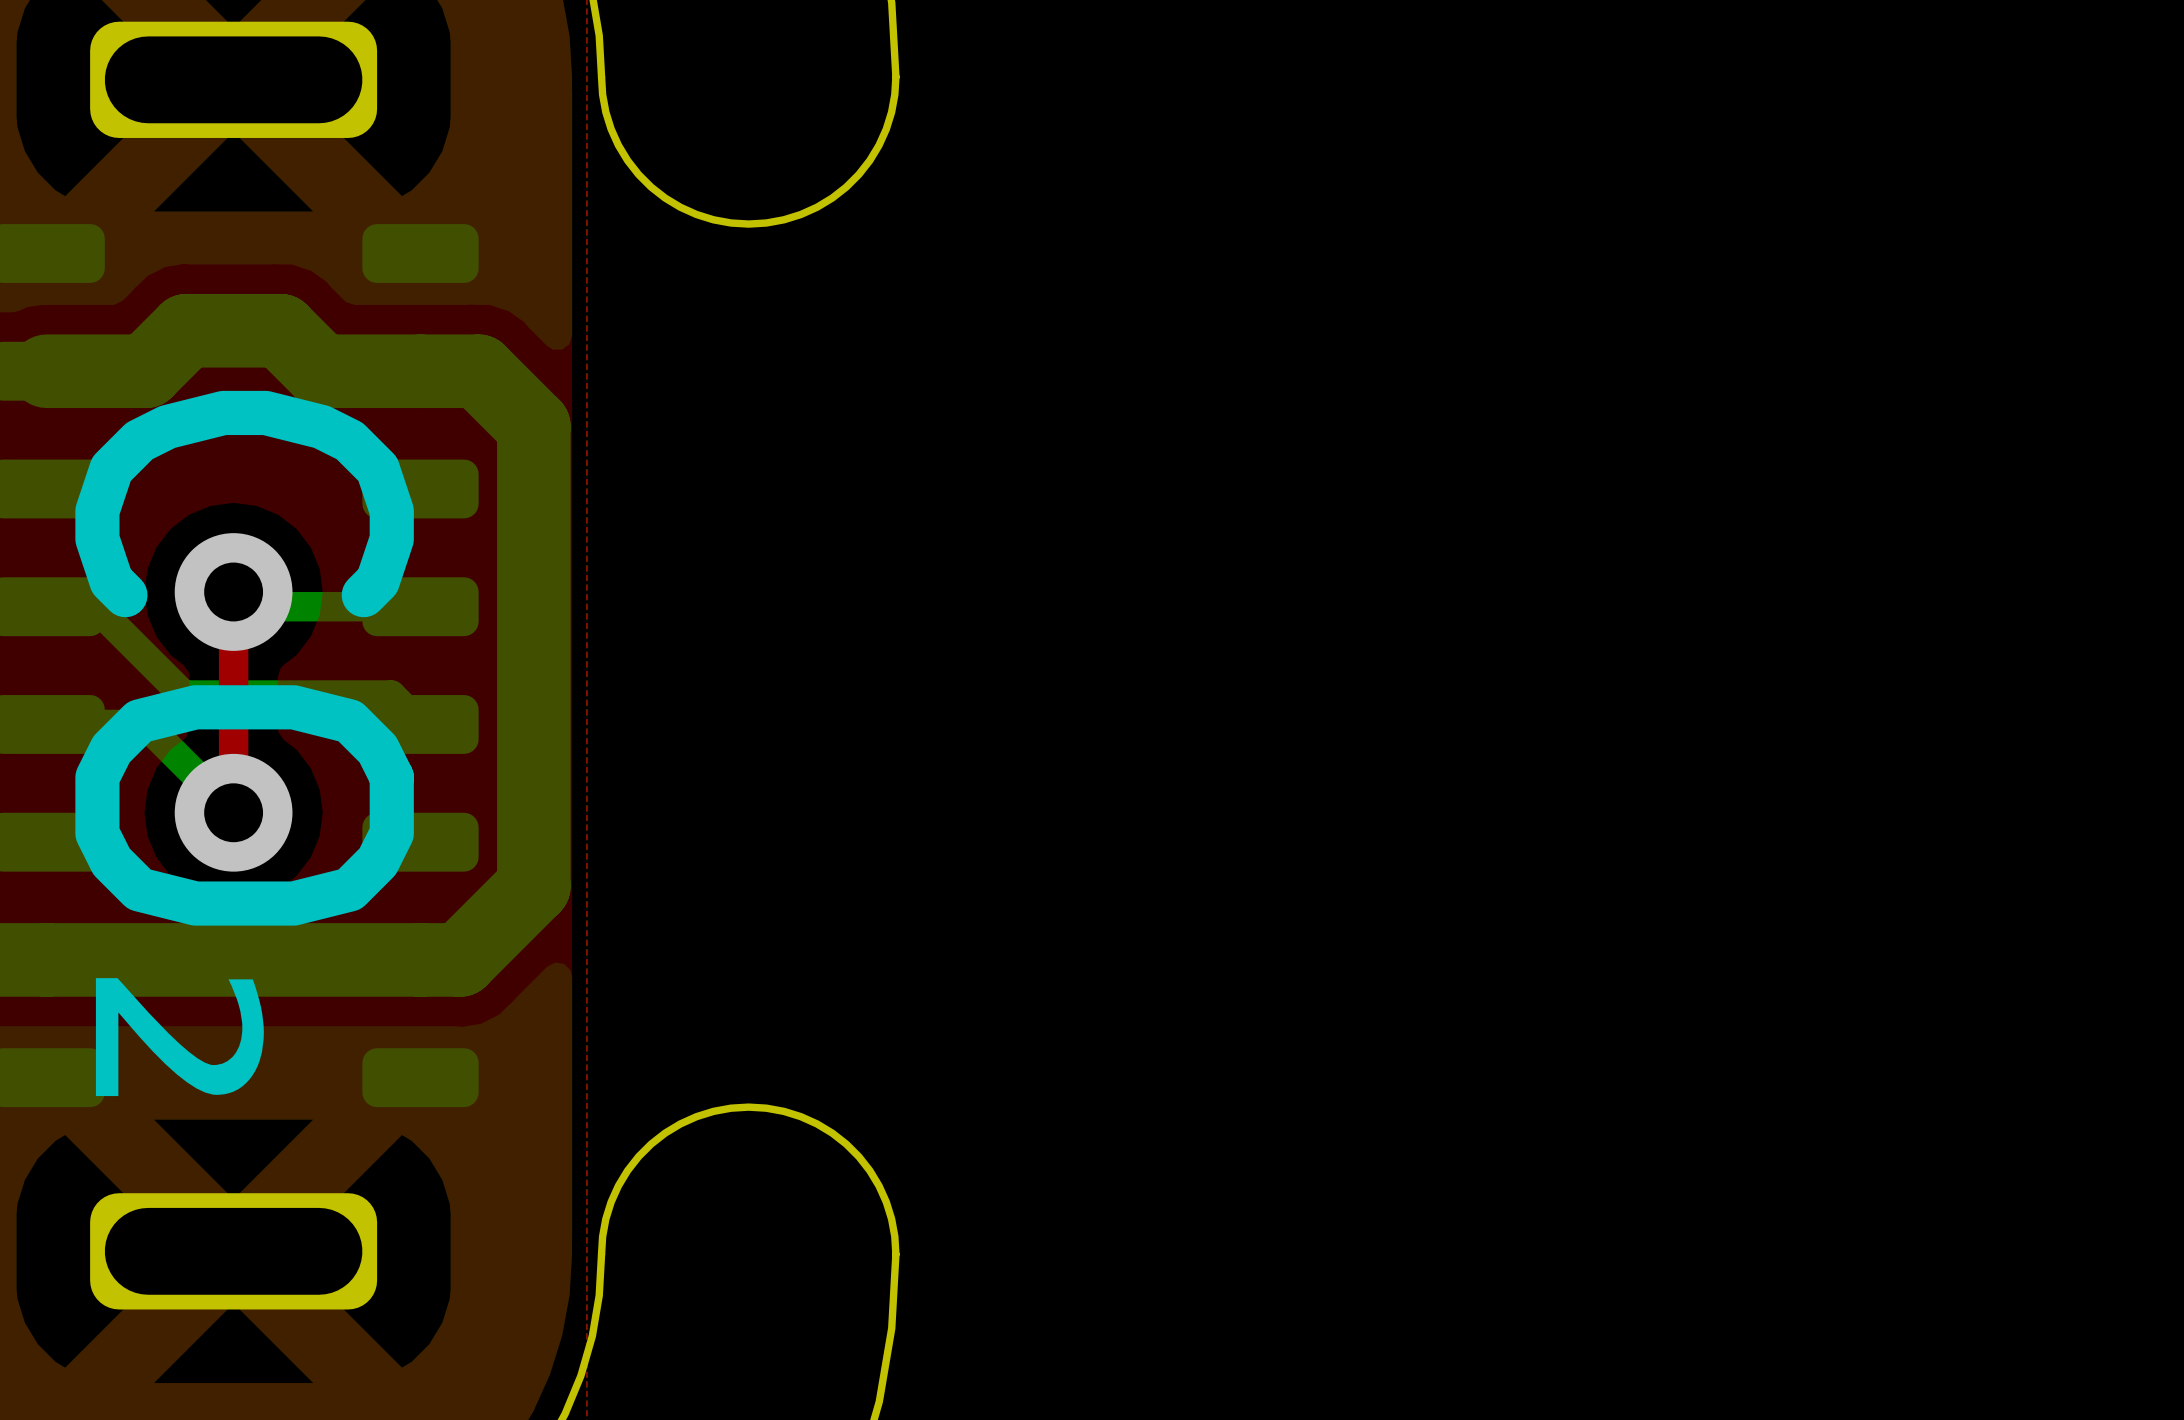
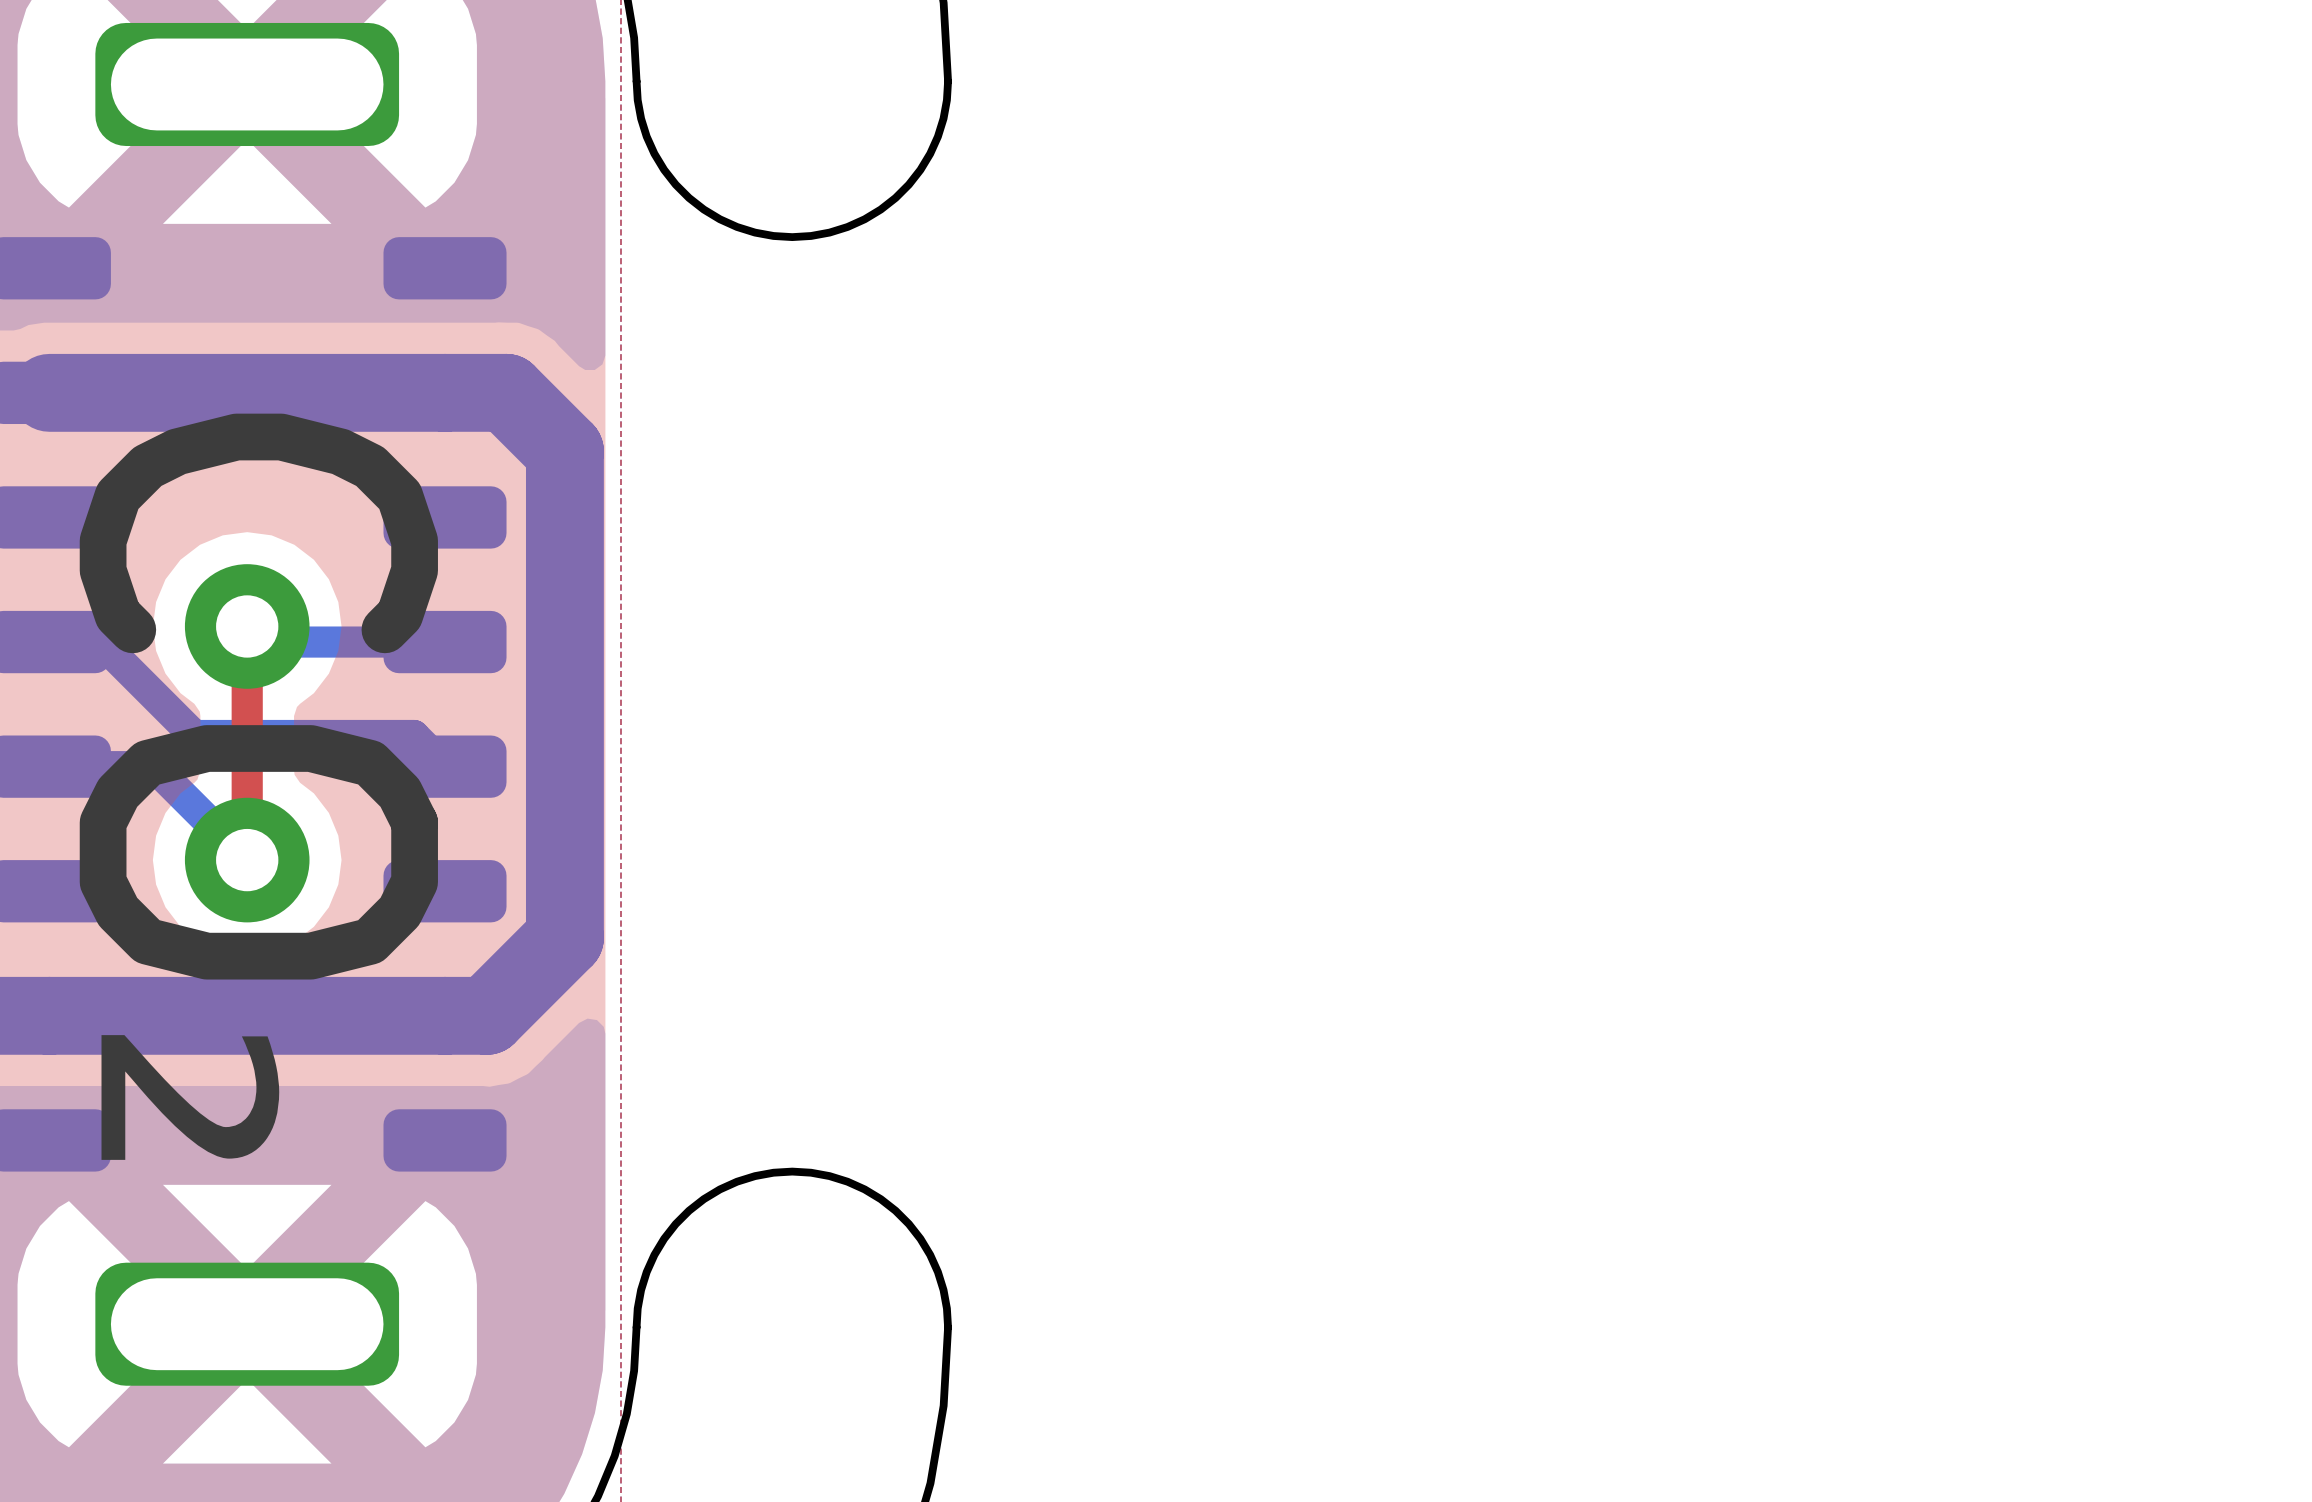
bottom track: (145, 371) (186, 330) (280, 330) (321, 371) -> (154, 392) (340, 392)

